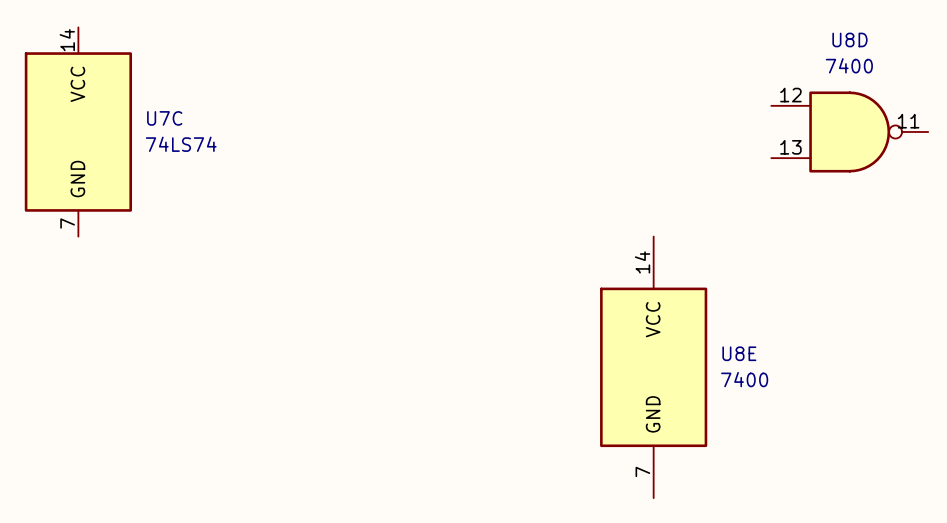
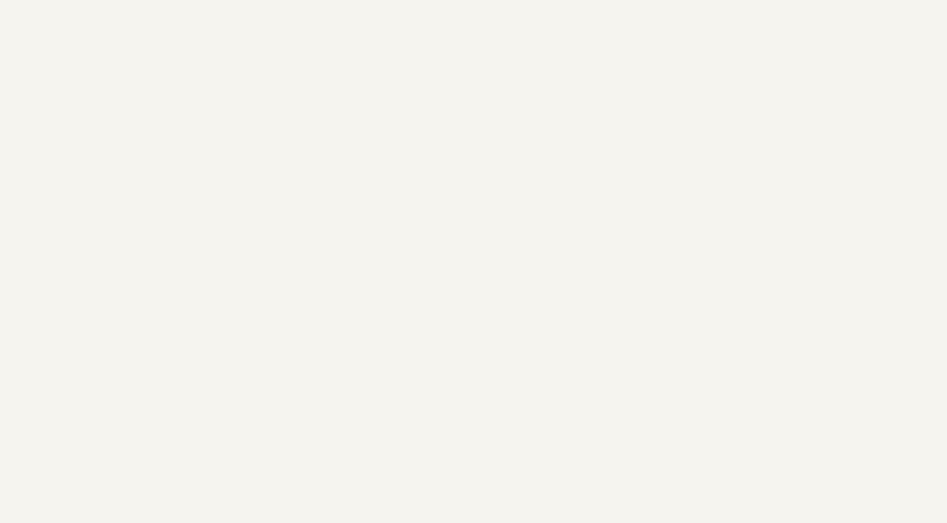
U7C: 74LS74 (78, 131) -> none
U8D: 7400 (849, 131) -> none
U8E: 7400 (653, 367) -> none

